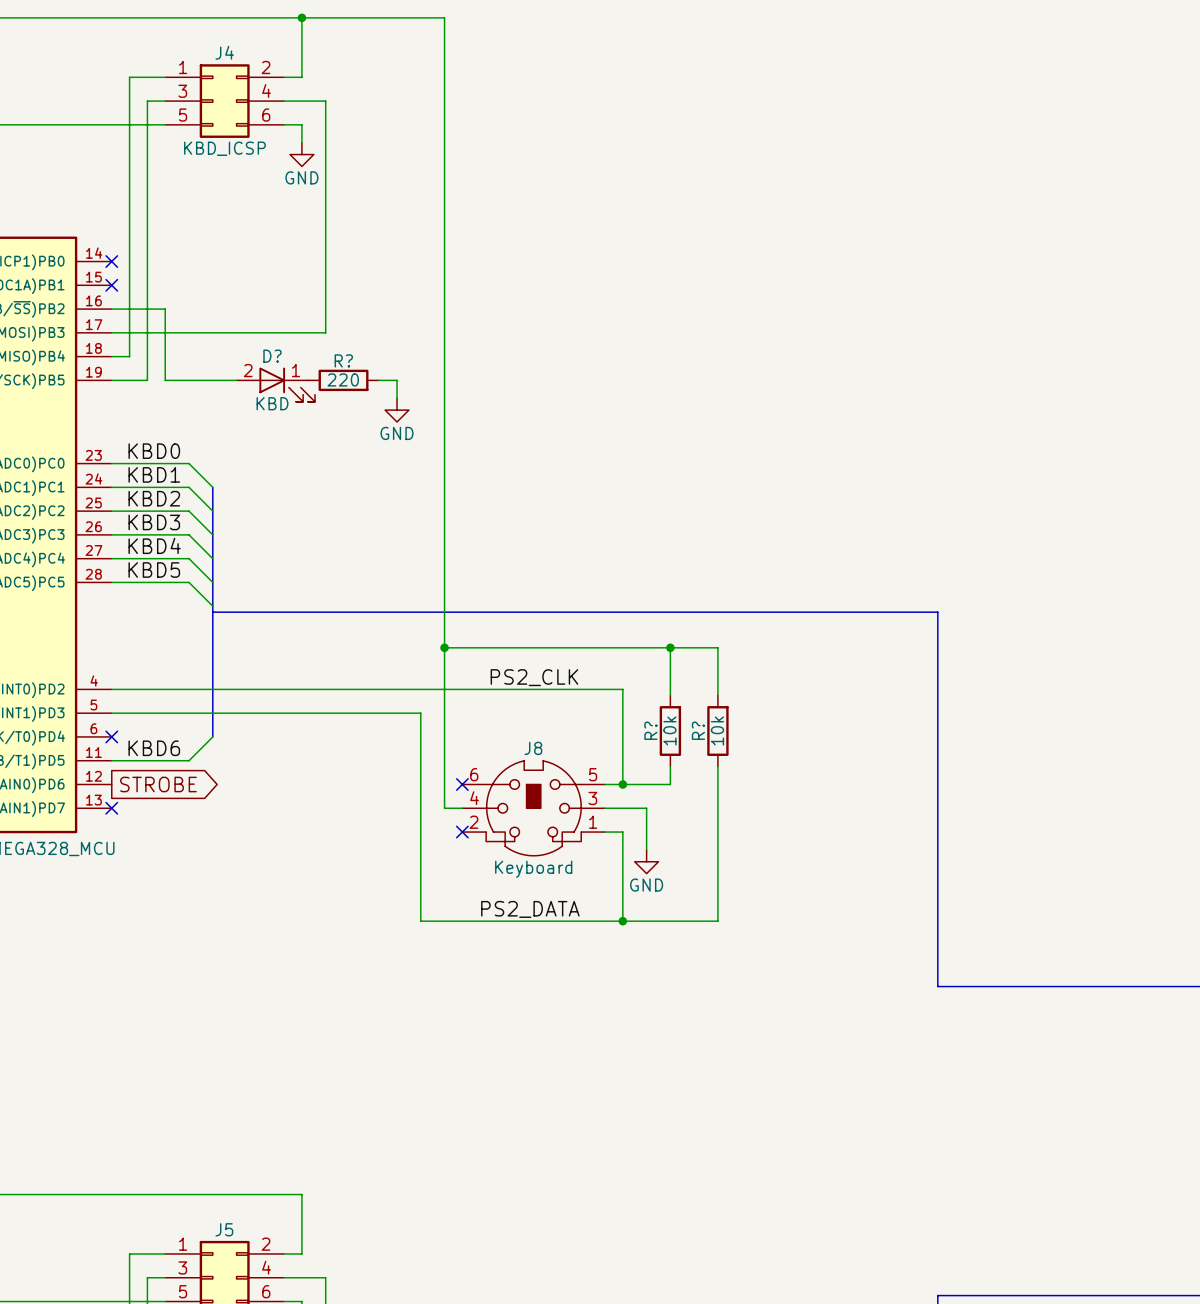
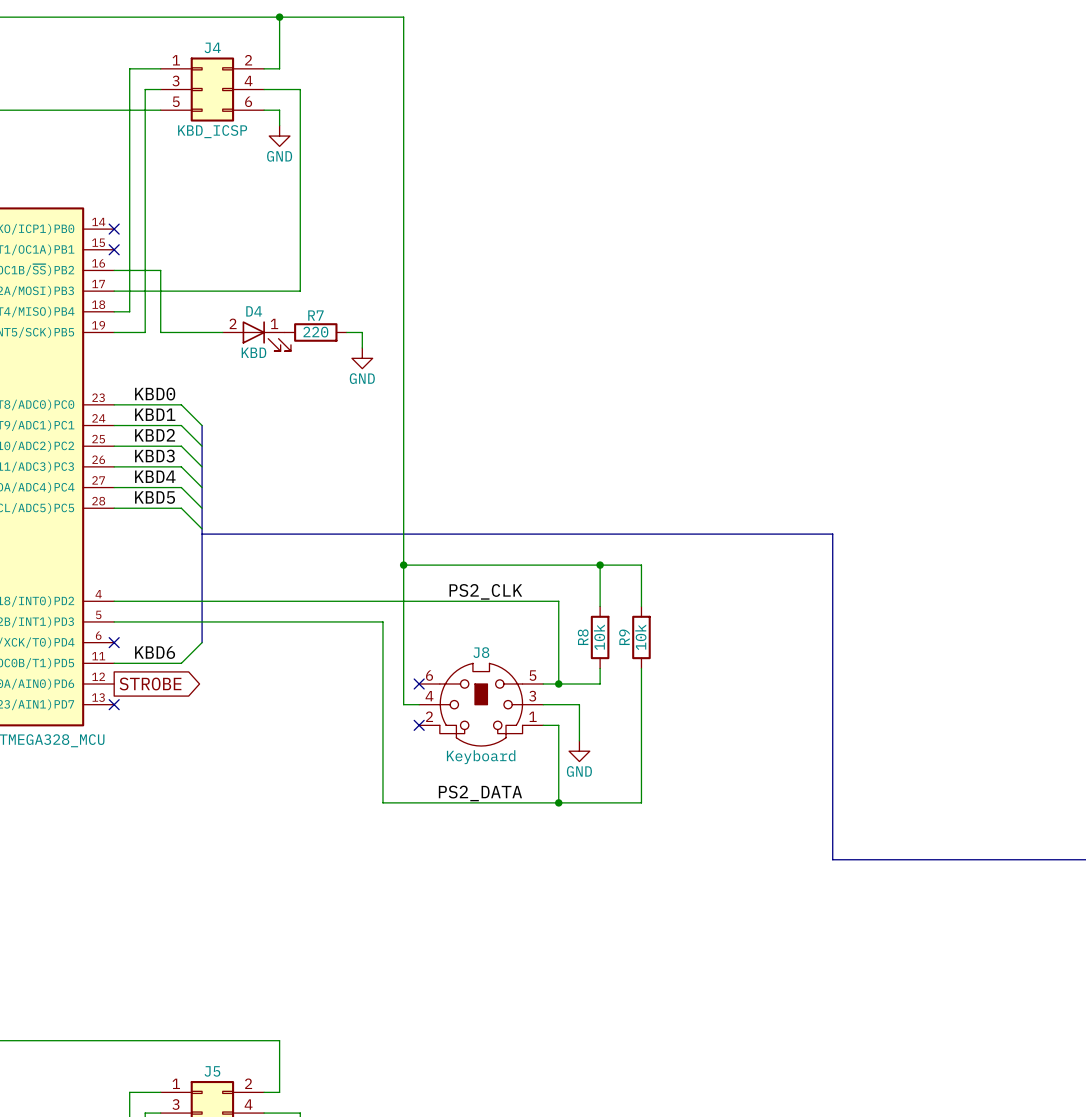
D? name: D? (272, 356) -> D4 (254, 311)
R? name: R? (343, 360) -> R7 (315, 315)
R? name: R? (650, 730) -> R8 (583, 637)
R? name: R? (698, 730) -> R9 (624, 637)

